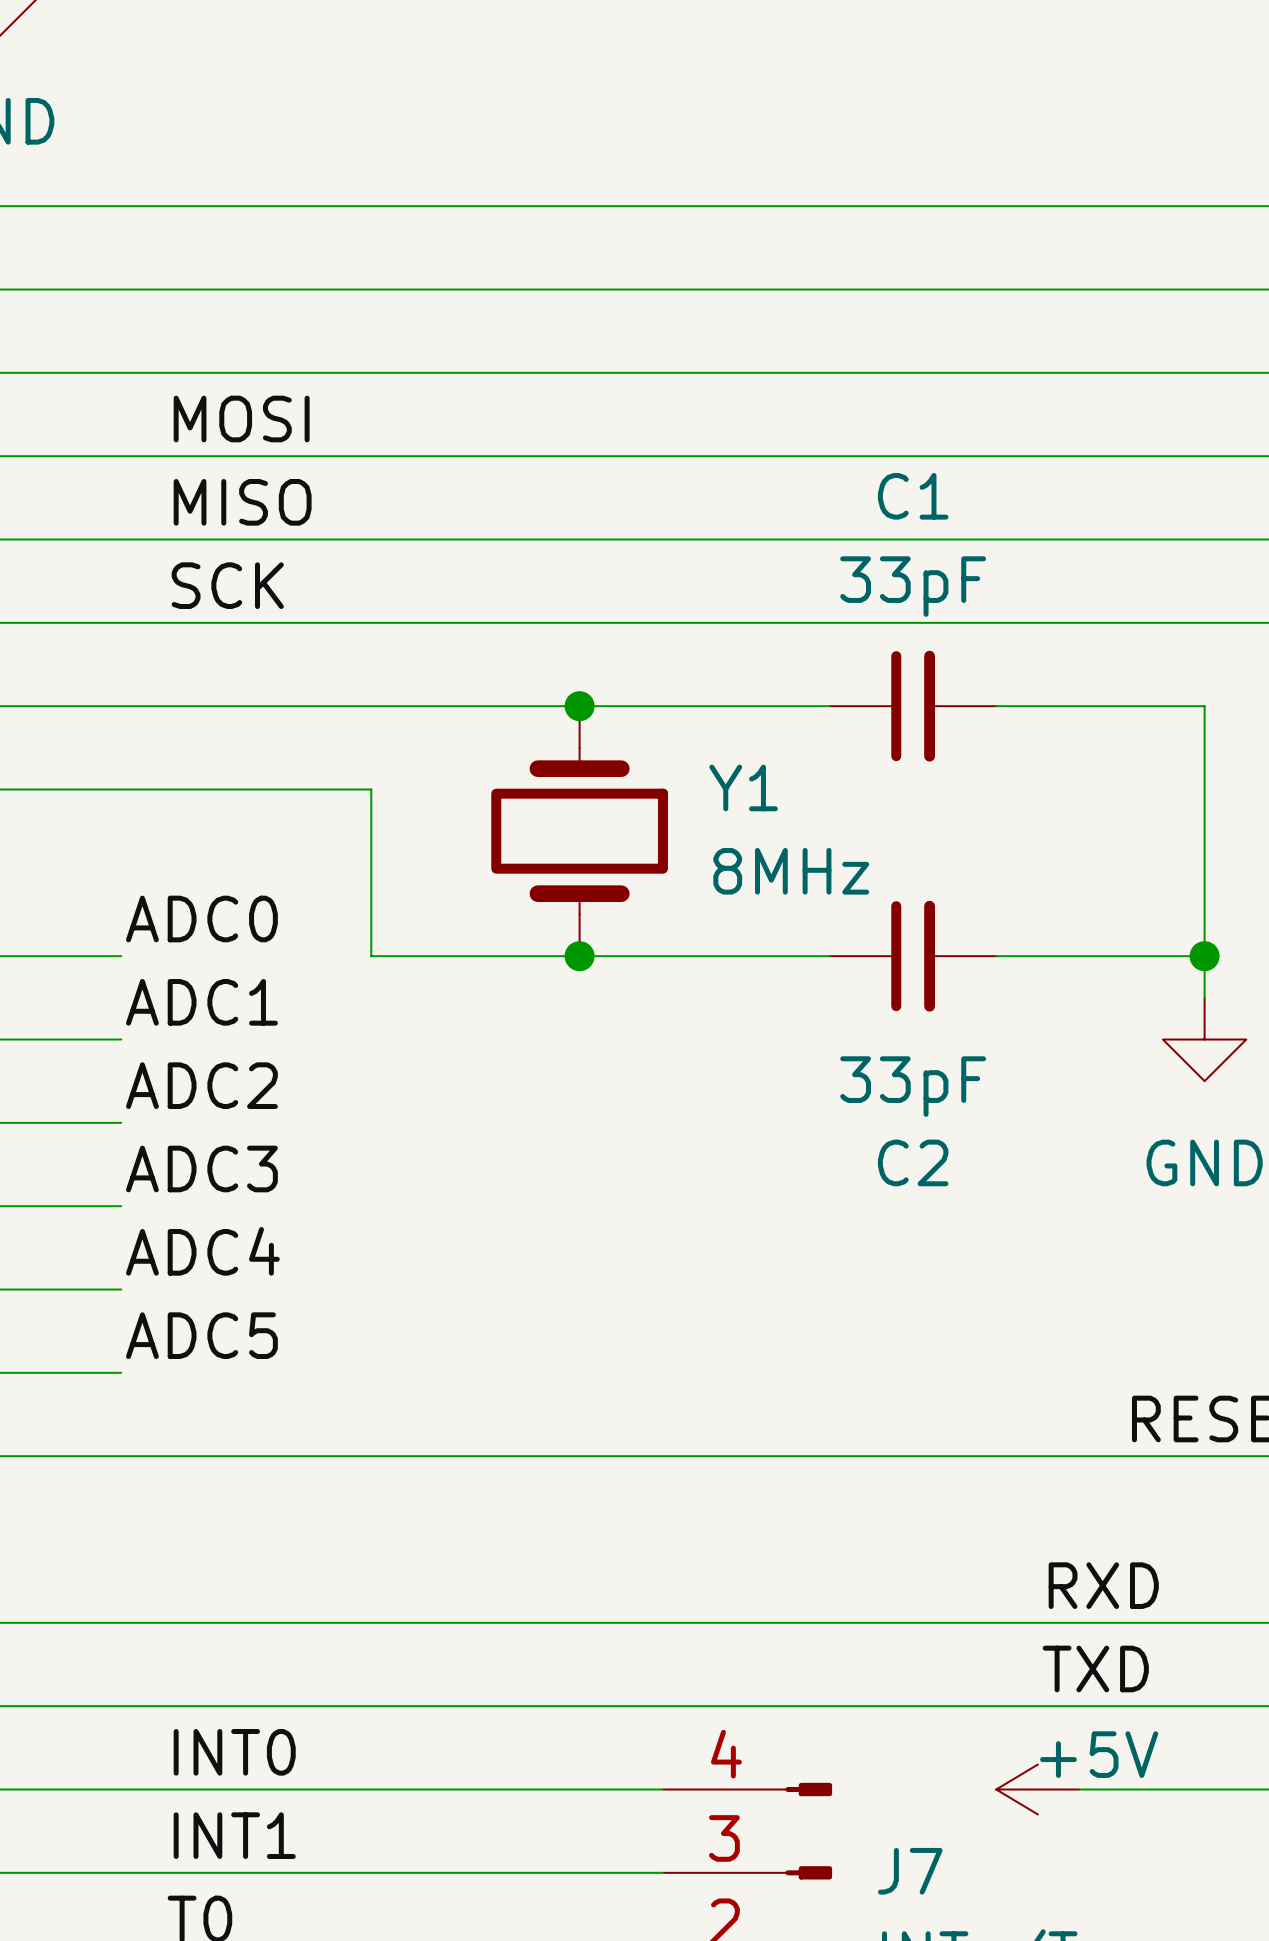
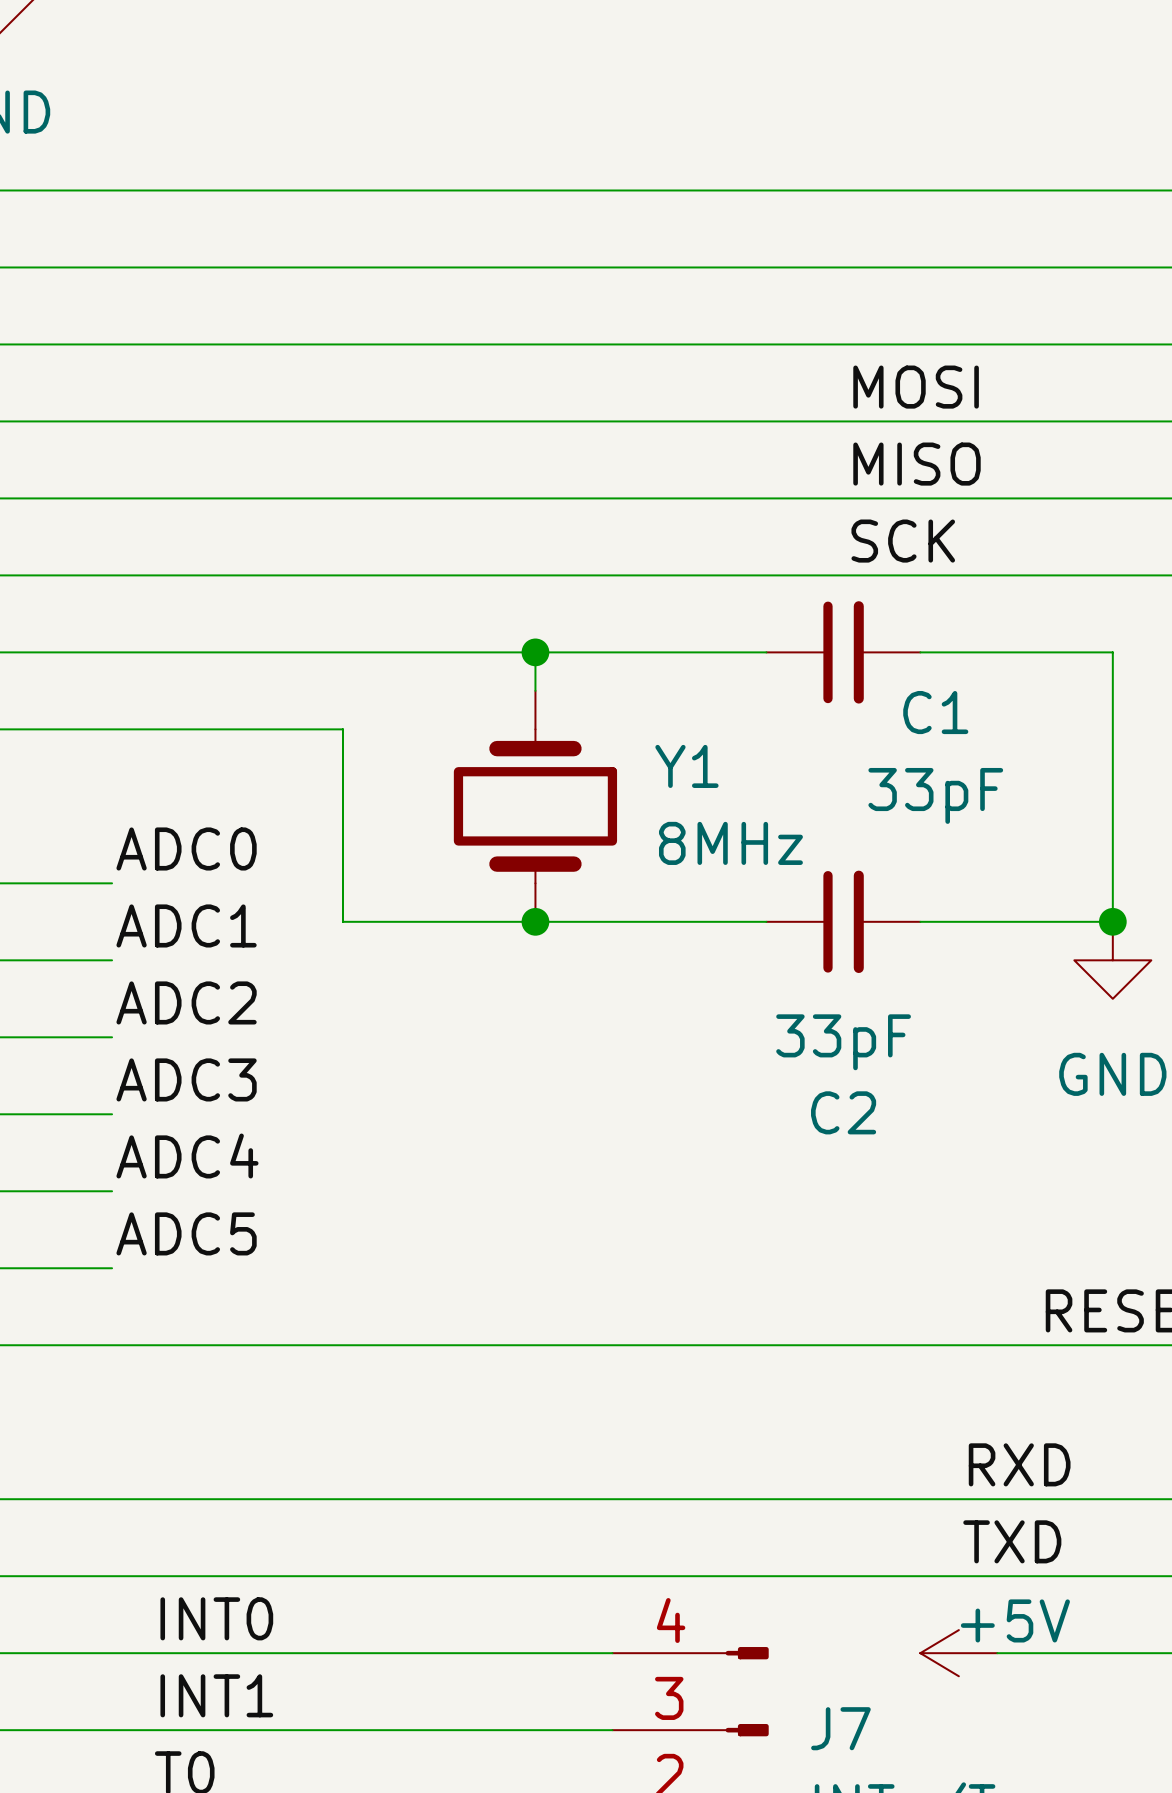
label position: MOSI (241, 419) -> MOSI (916, 387)
C1 name position: C1 (913, 496) -> C1 (935, 712)
label position: MISO (242, 502) -> MISO (916, 464)
label position: SCK (227, 585) -> SCK (903, 541)
C1 value position: 33pF (913, 586) -> 33pF (935, 795)
Y1 position: (579, 831) -> (535, 806)
wire: (371, 956) (829, 956) -> (342, 883) (342, 921) (766, 921)
junction position: (579, 956) -> (535, 921)
C2 position: (912, 956) -> (843, 921)
wire: (996, 956) (1204, 956) -> (920, 921) (1112, 921)
junction position: (1204, 956) -> (1112, 921)

